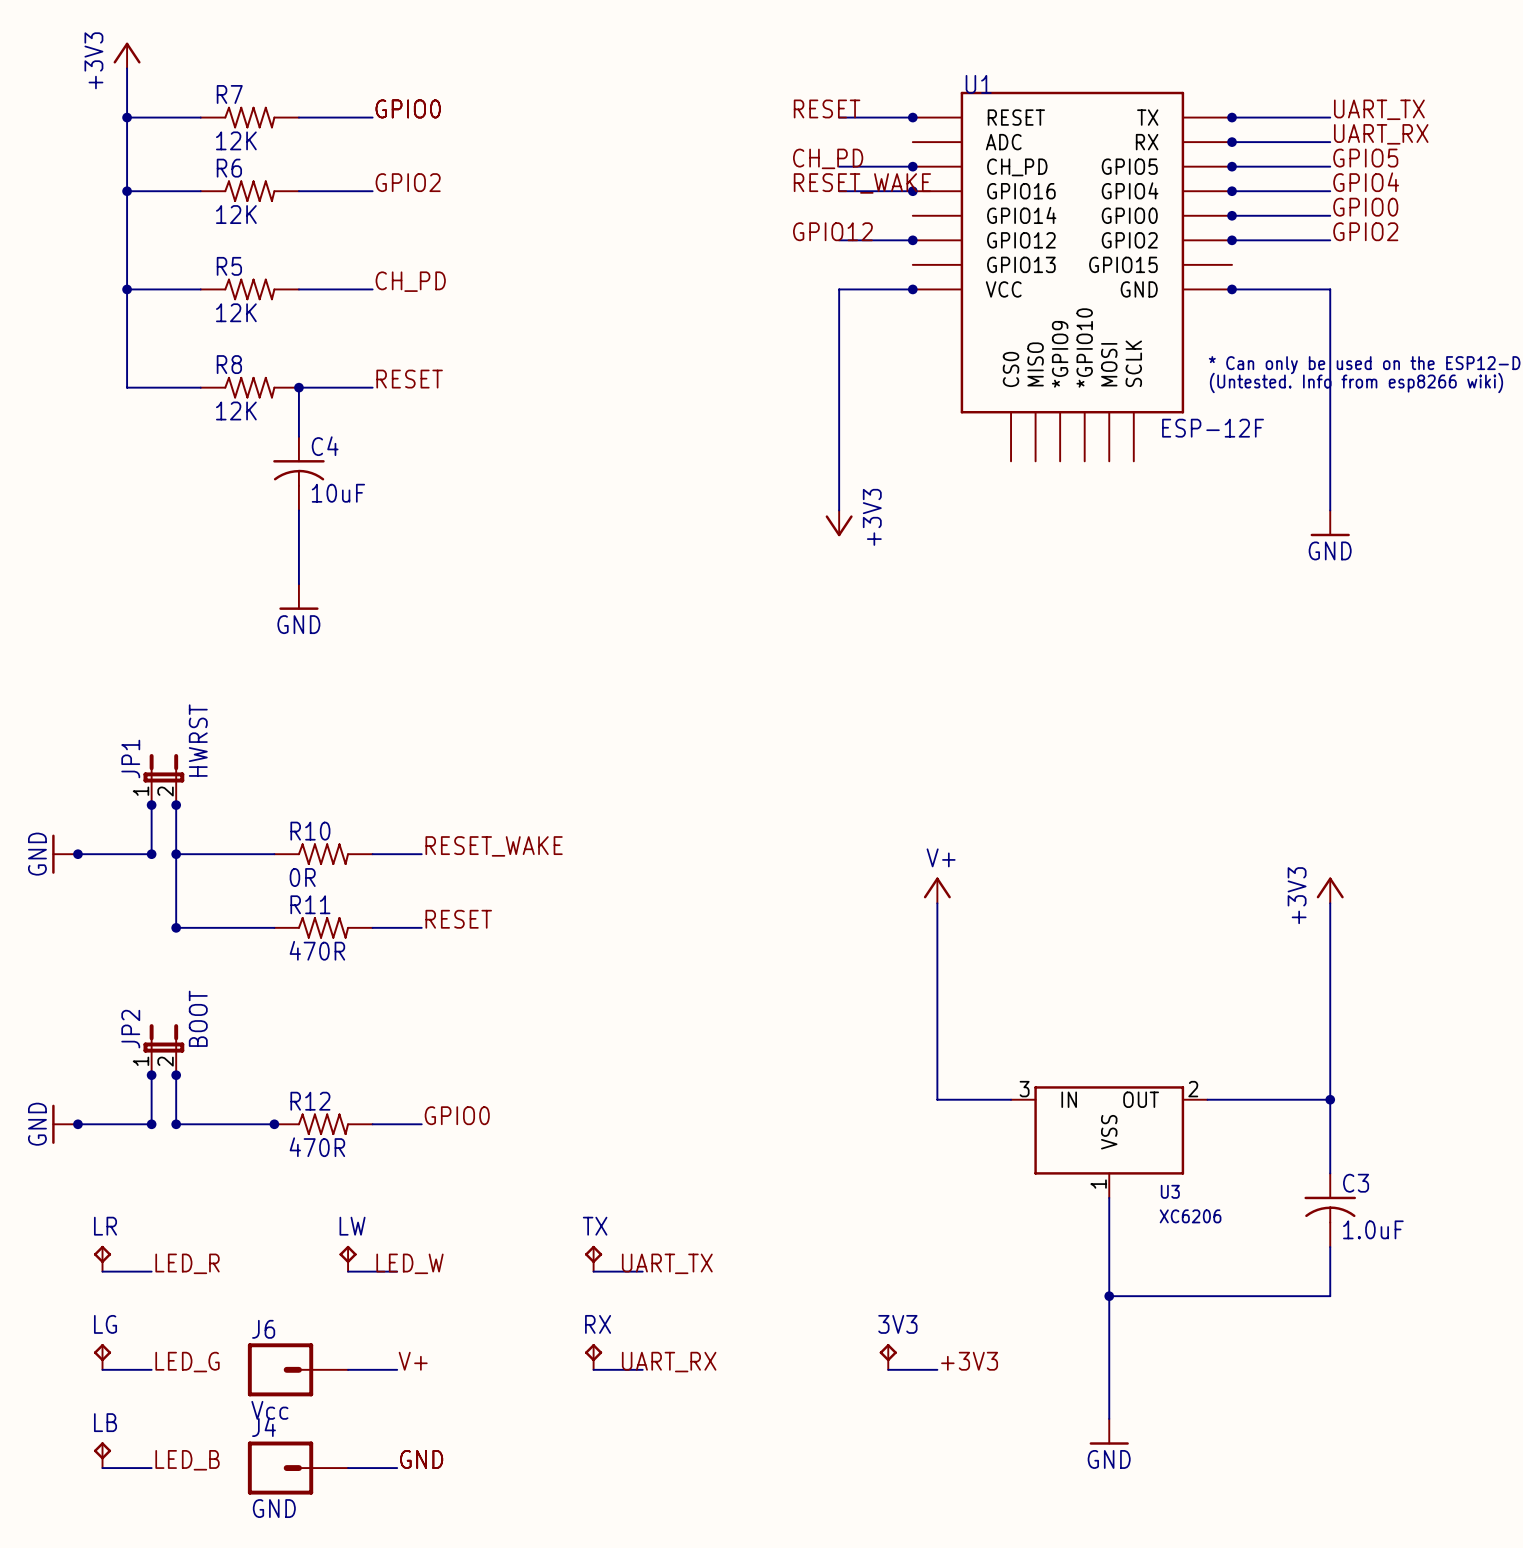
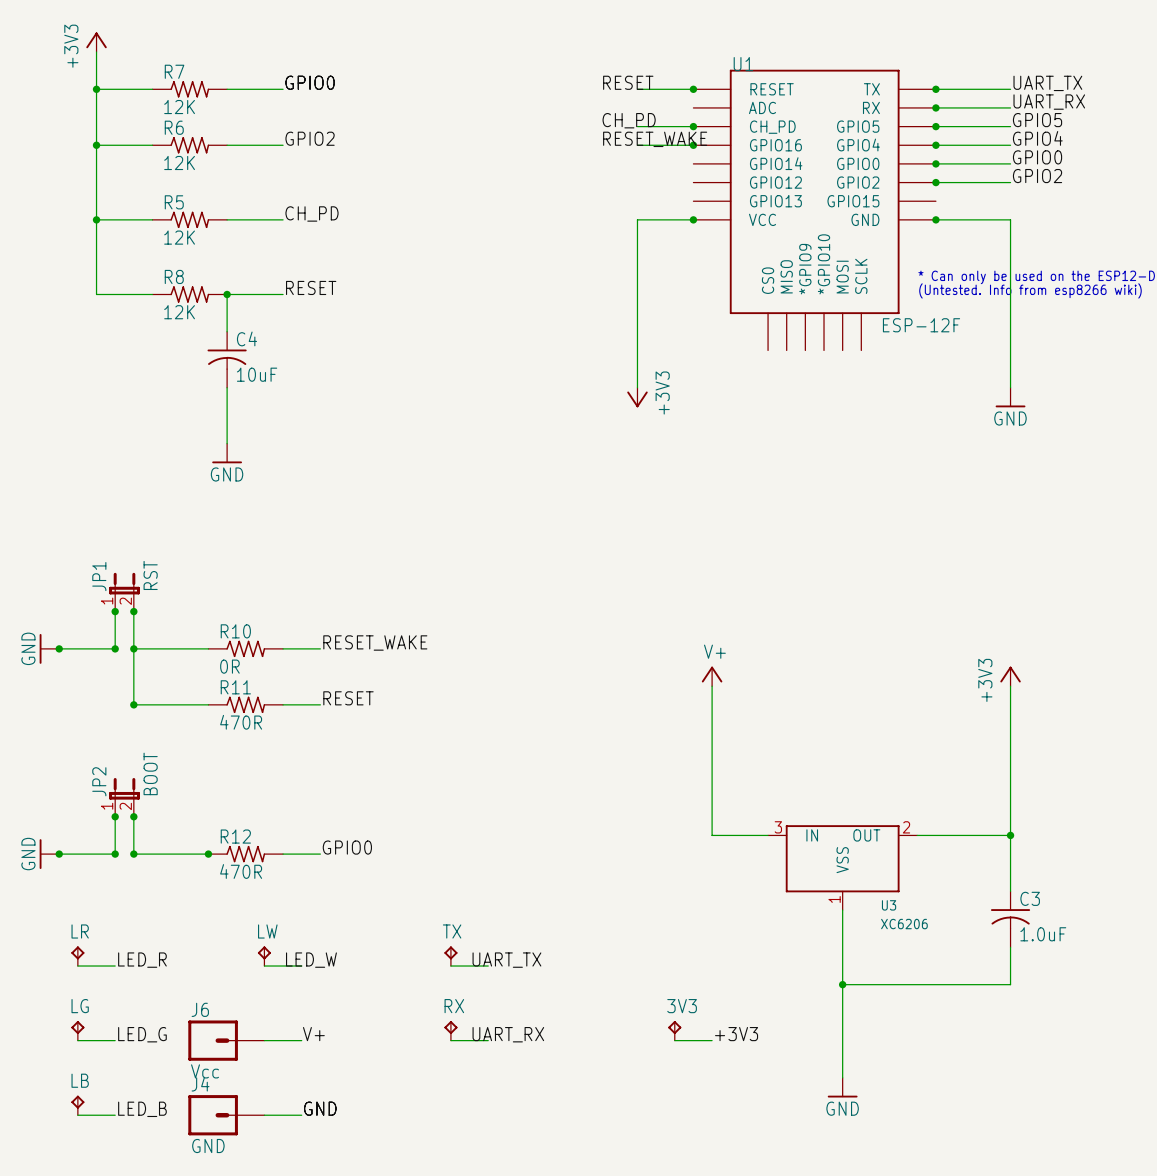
label: GPIO12 (832, 231) -> none
wire: (839, 240) (912, 240) -> none
junction: (912, 240) -> none
JP1 value: HWRST (198, 740) -> RST (150, 575)

